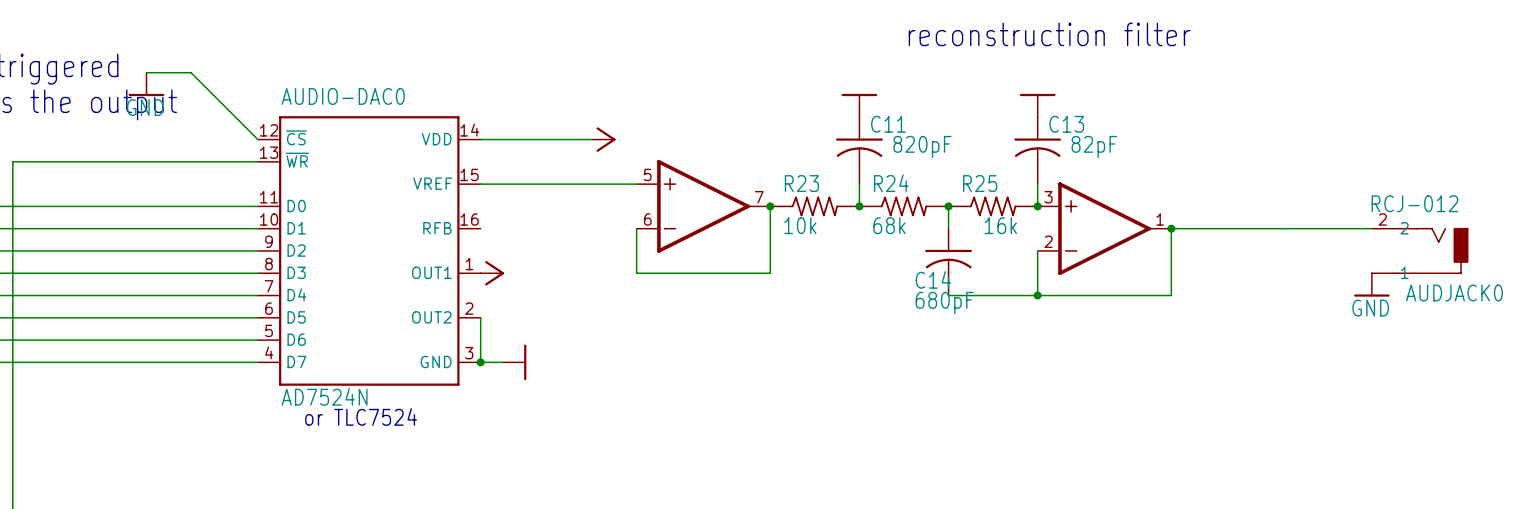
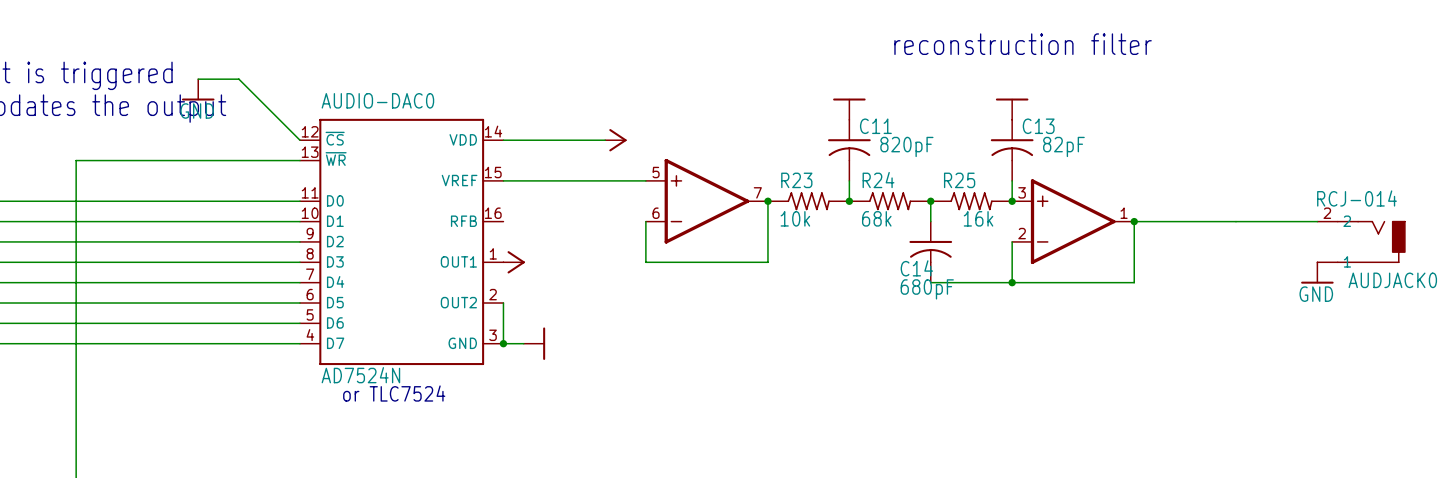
AUDJACK0 value: RCJ-012 (1414, 203) -> RCJ-014 (1357, 198)

